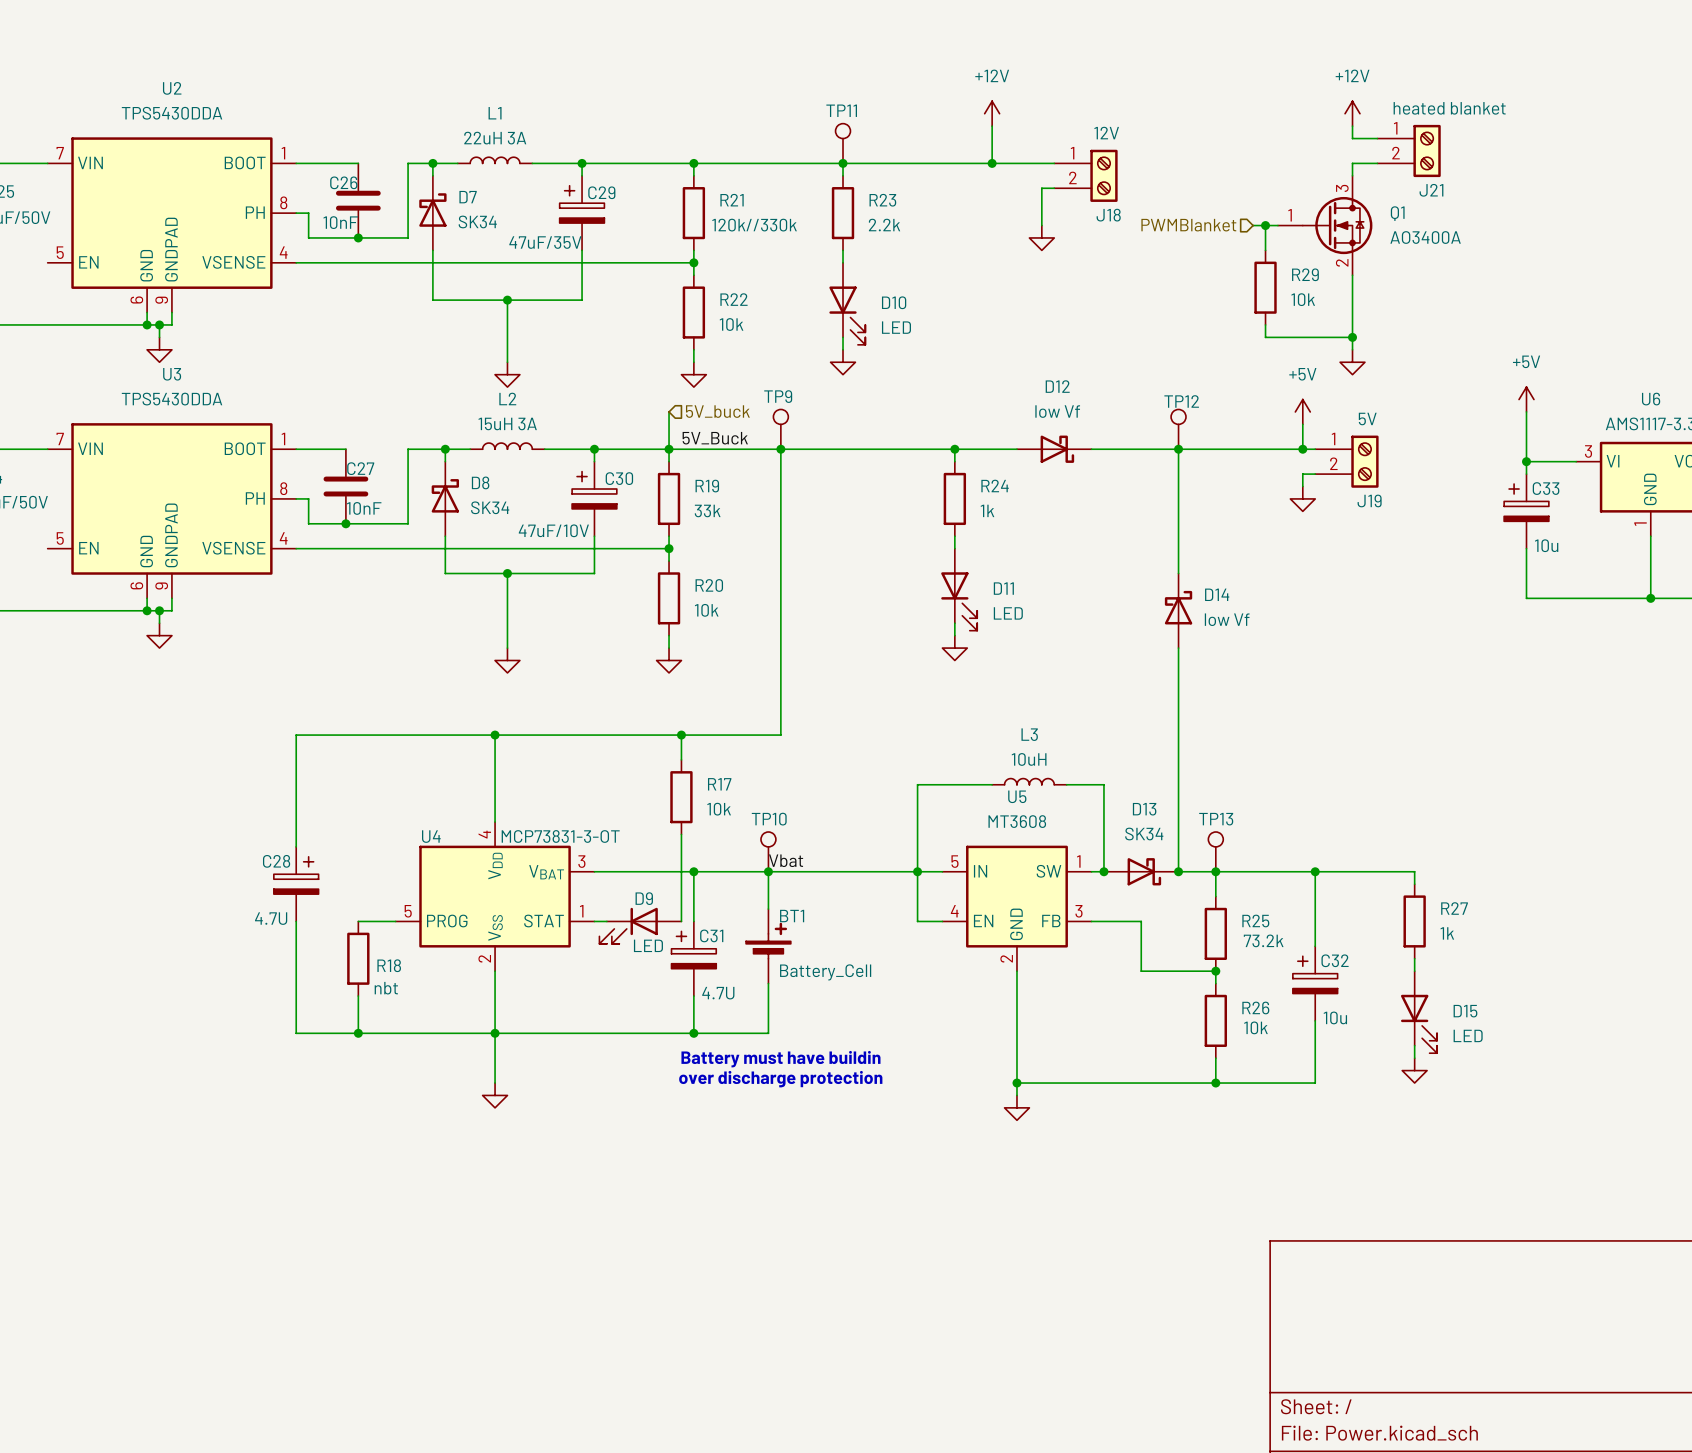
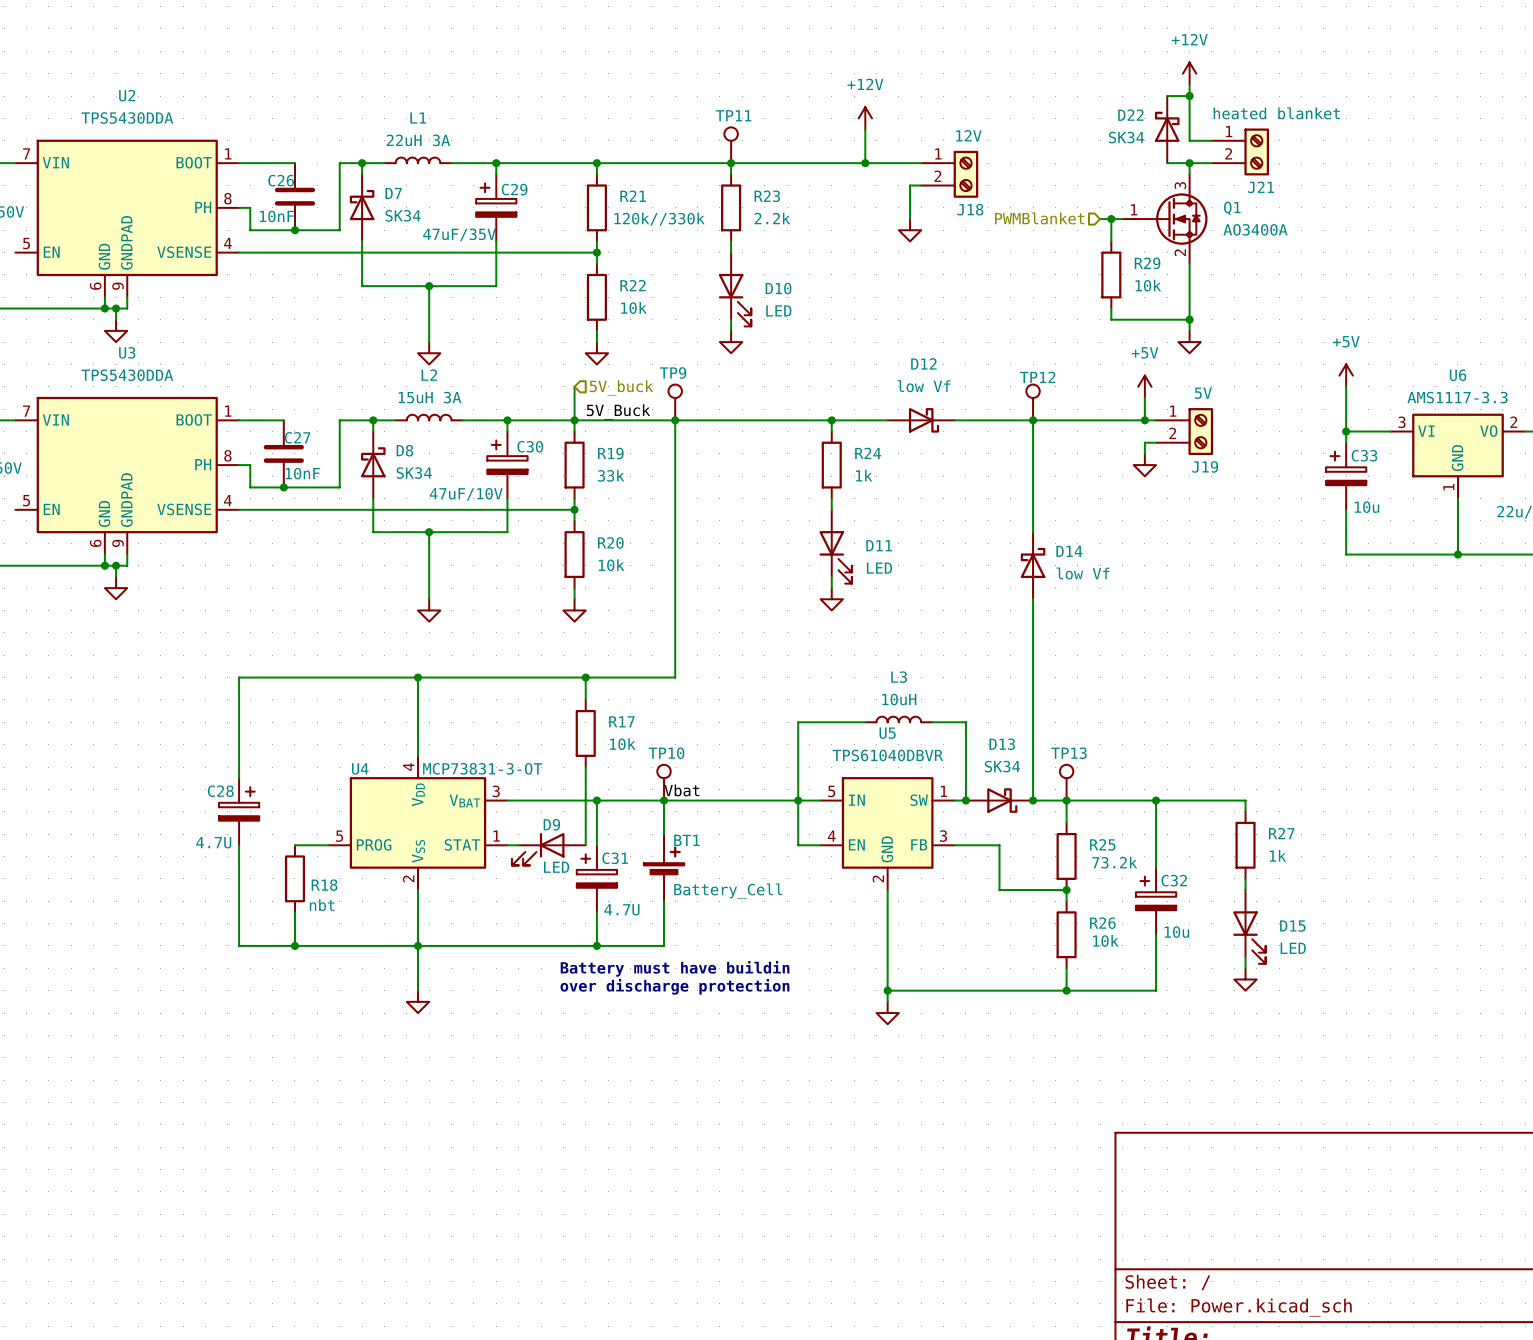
wire: none -> (1167, 96) (1189, 96)
junction: none -> (1189, 96)
power symbol position: +12V (1352, 113) -> +12V (1189, 73)
D22: none -> SK34 (1167, 129)
wire: none -> (1167, 163) (1189, 163)
junction: none -> (1189, 163)
U5 value: MT3608 (1017, 821) -> TPS61040DBVR (887, 755)

